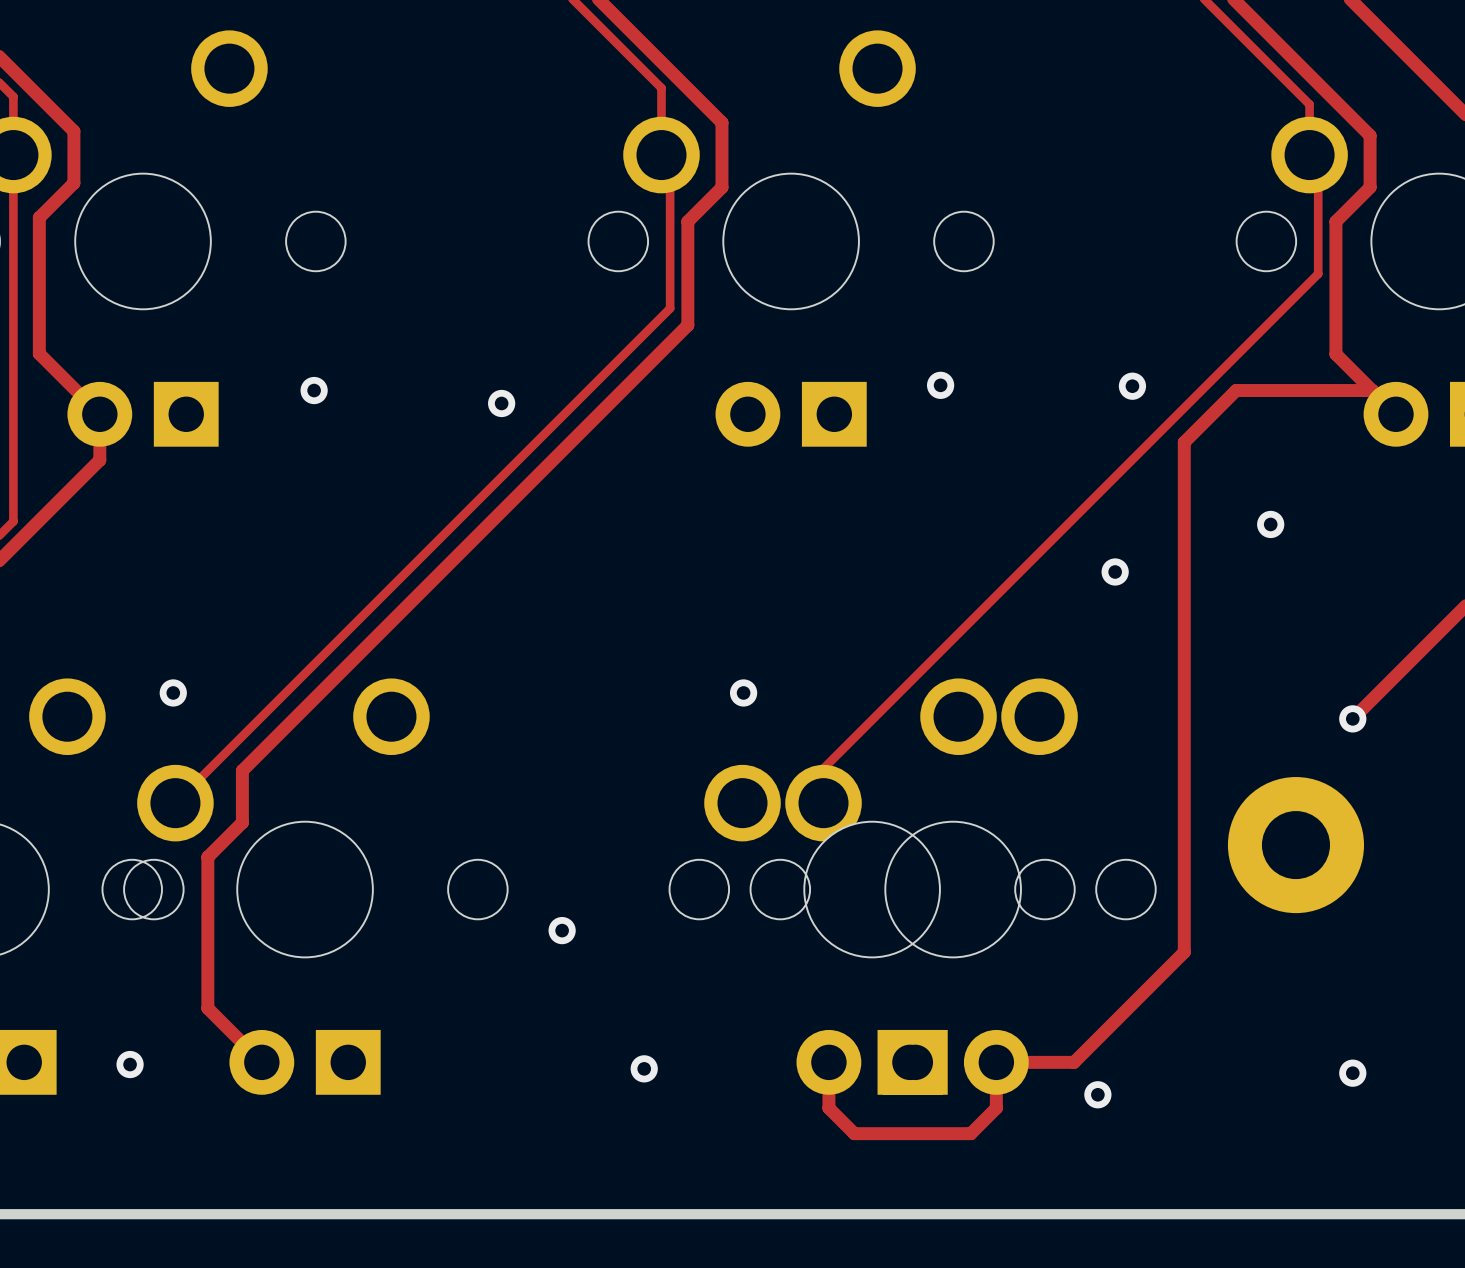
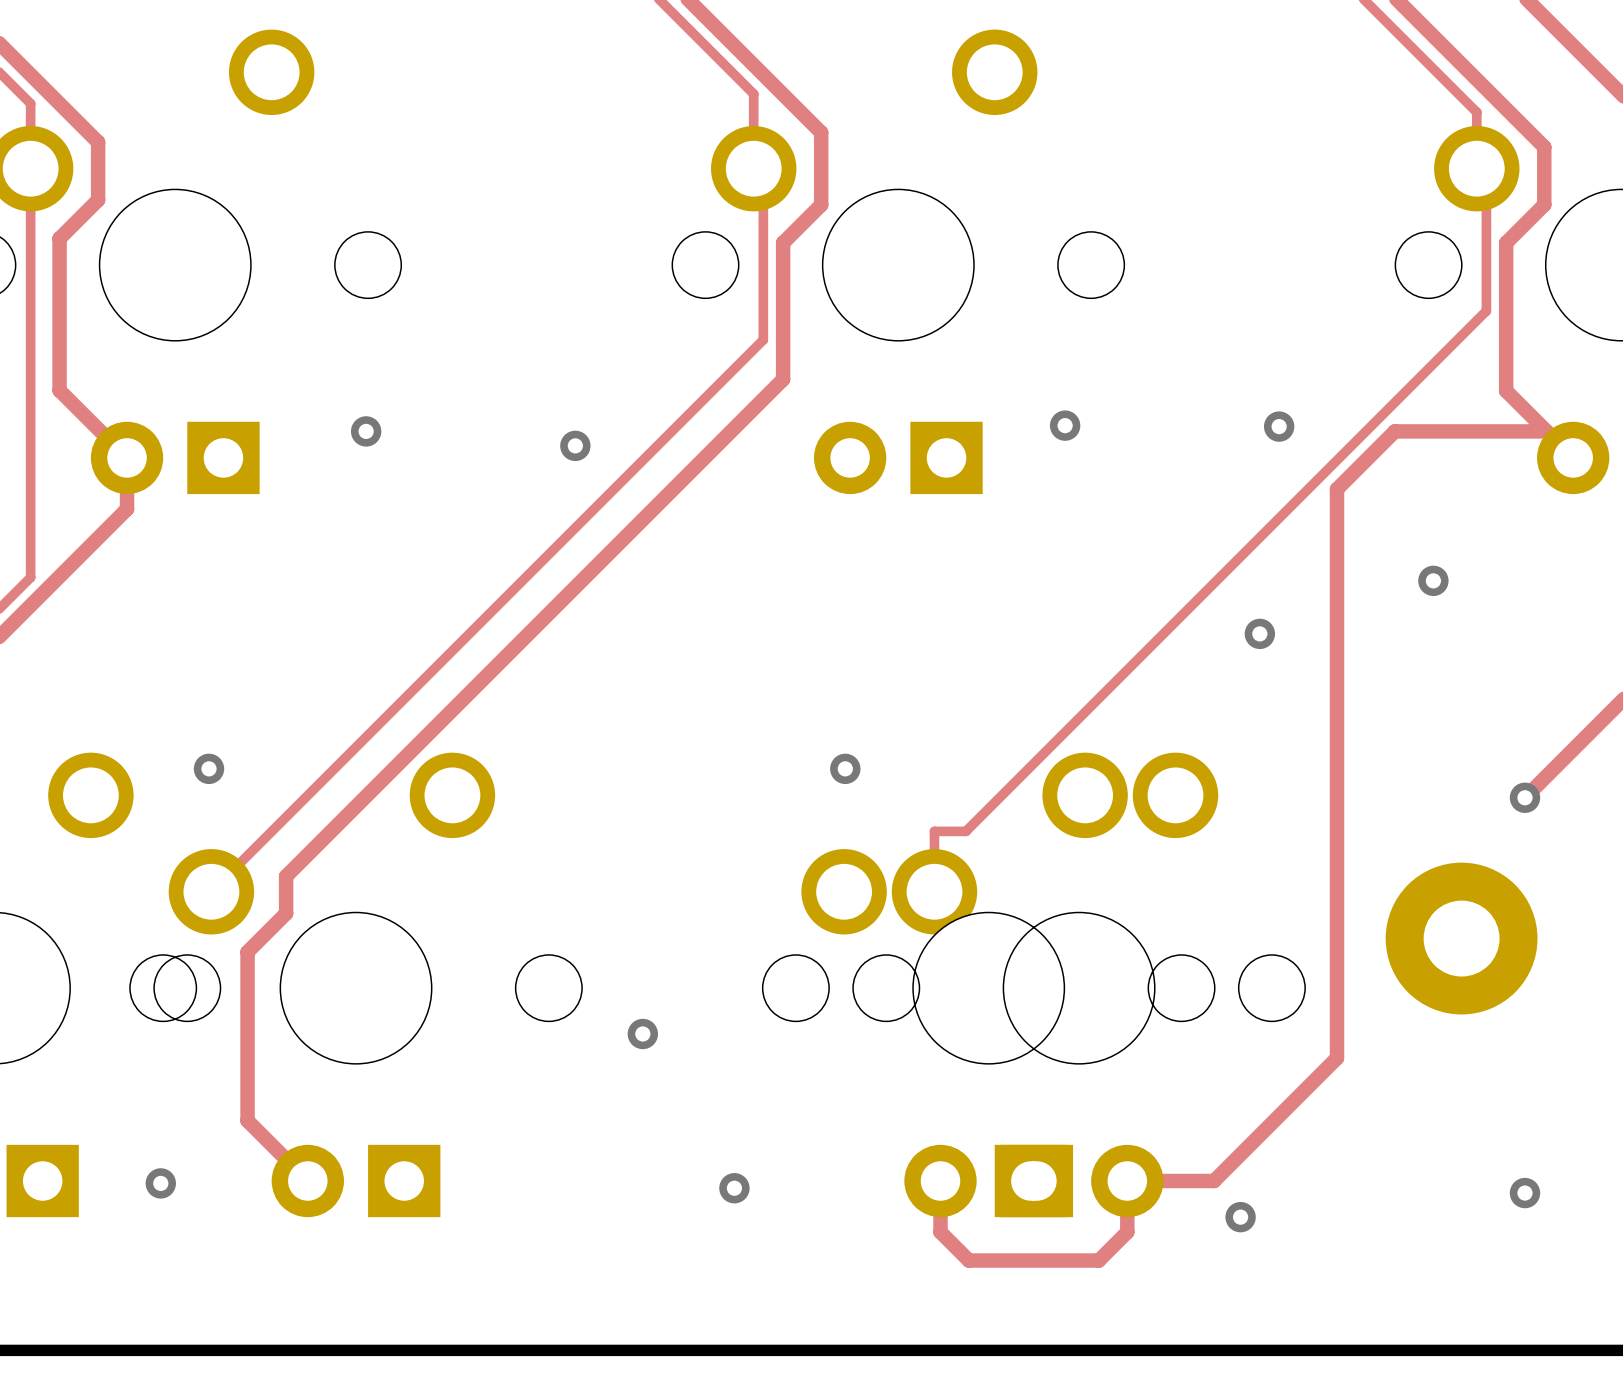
track: (1318, 273) (823, 768) -> (1486, 301) (1486, 310) (965, 831) (934, 831) (934, 853)
track: (687, 325) (242, 770) (242, 789) -> (783, 358) (783, 379) (286, 876)

